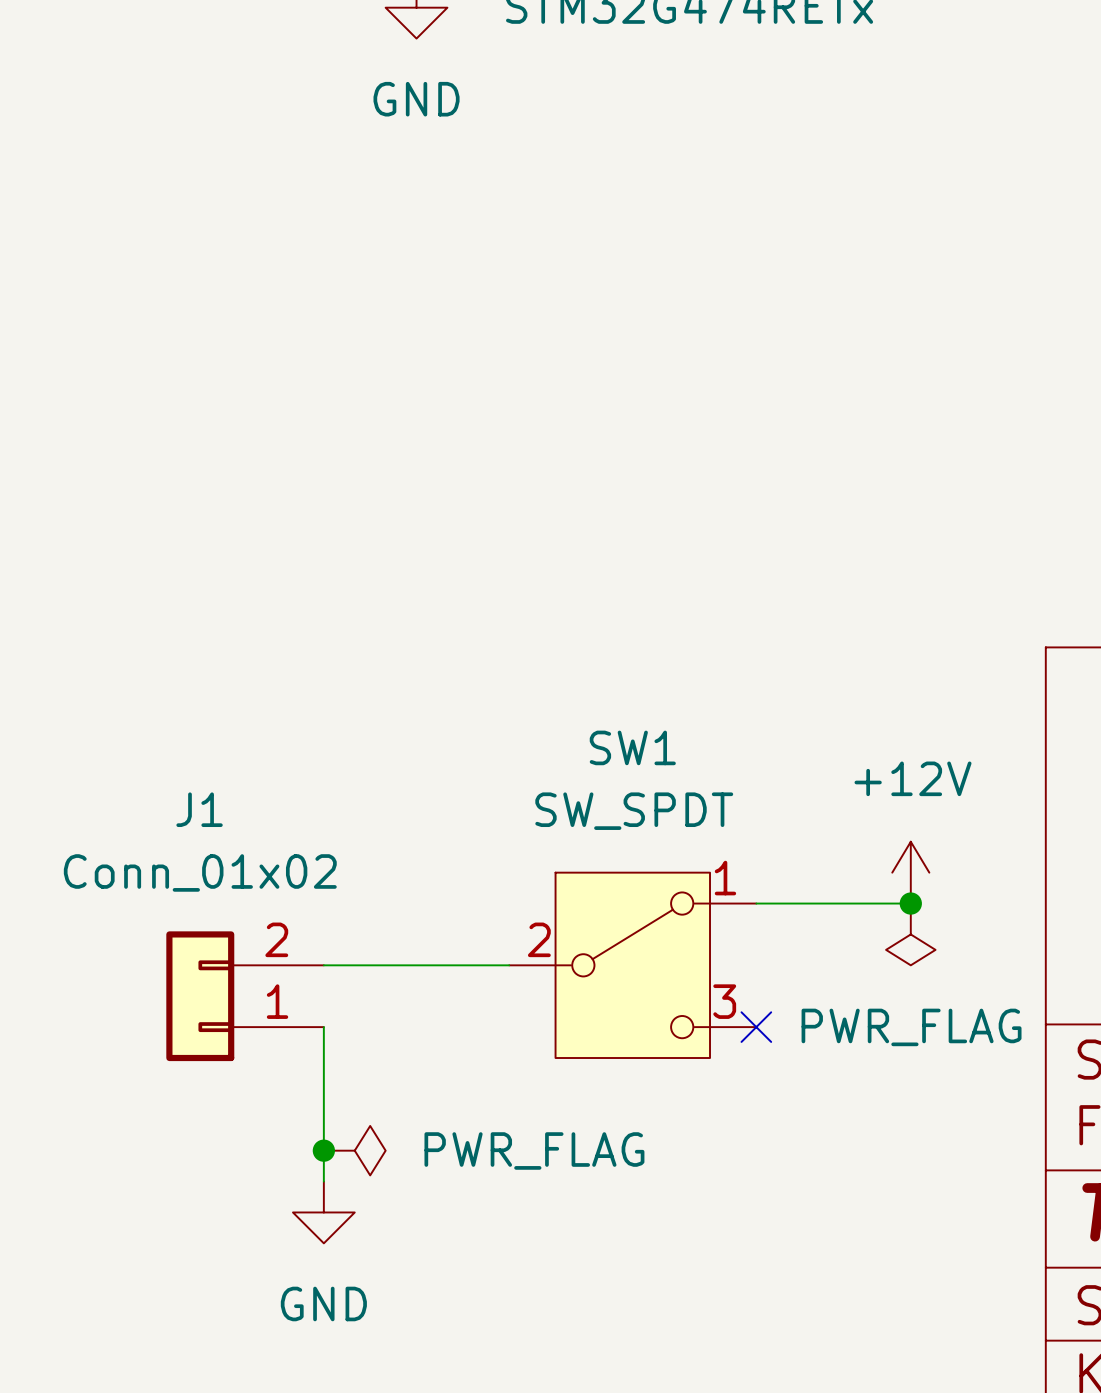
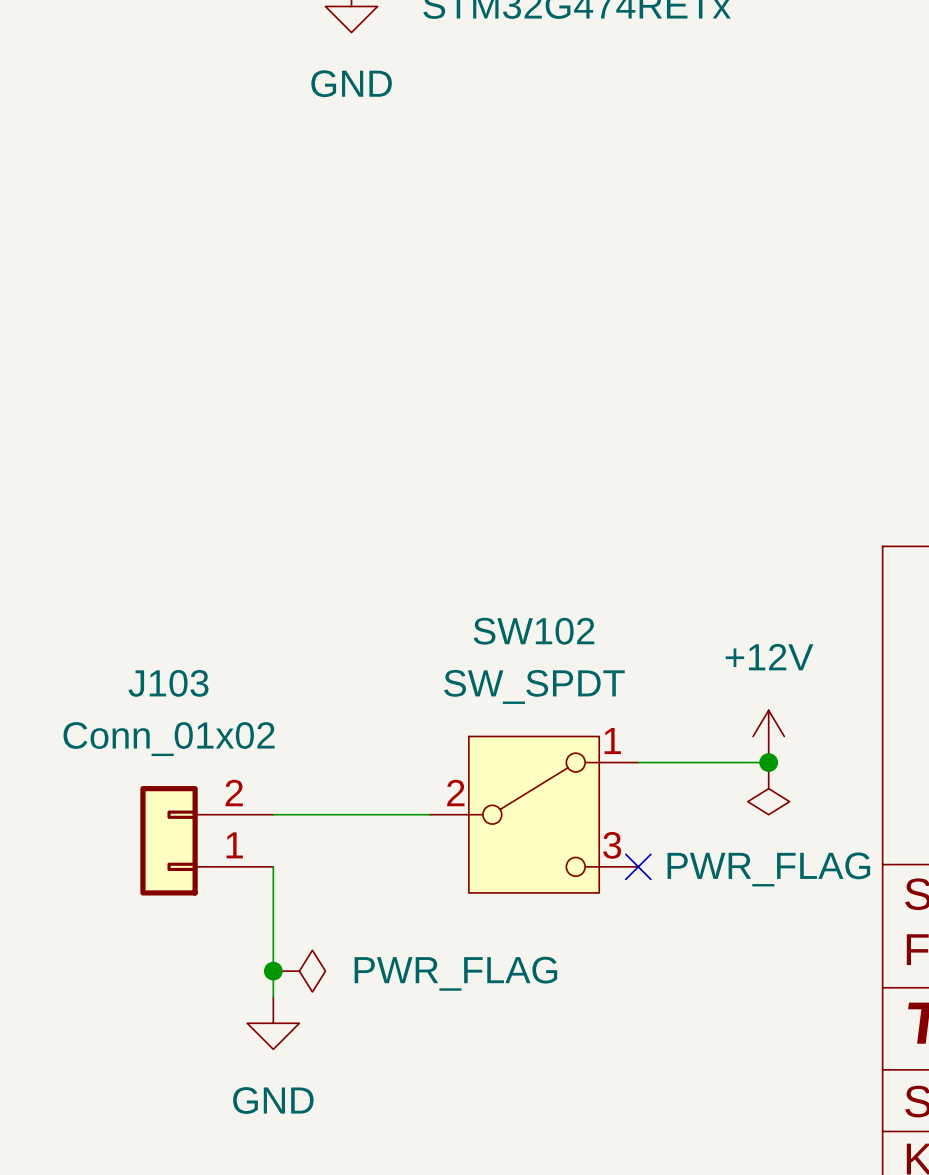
SW1 name: SW1 (632, 747) -> SW102 (533, 631)
J1 name: J1 (199, 809) -> J103 (168, 683)

